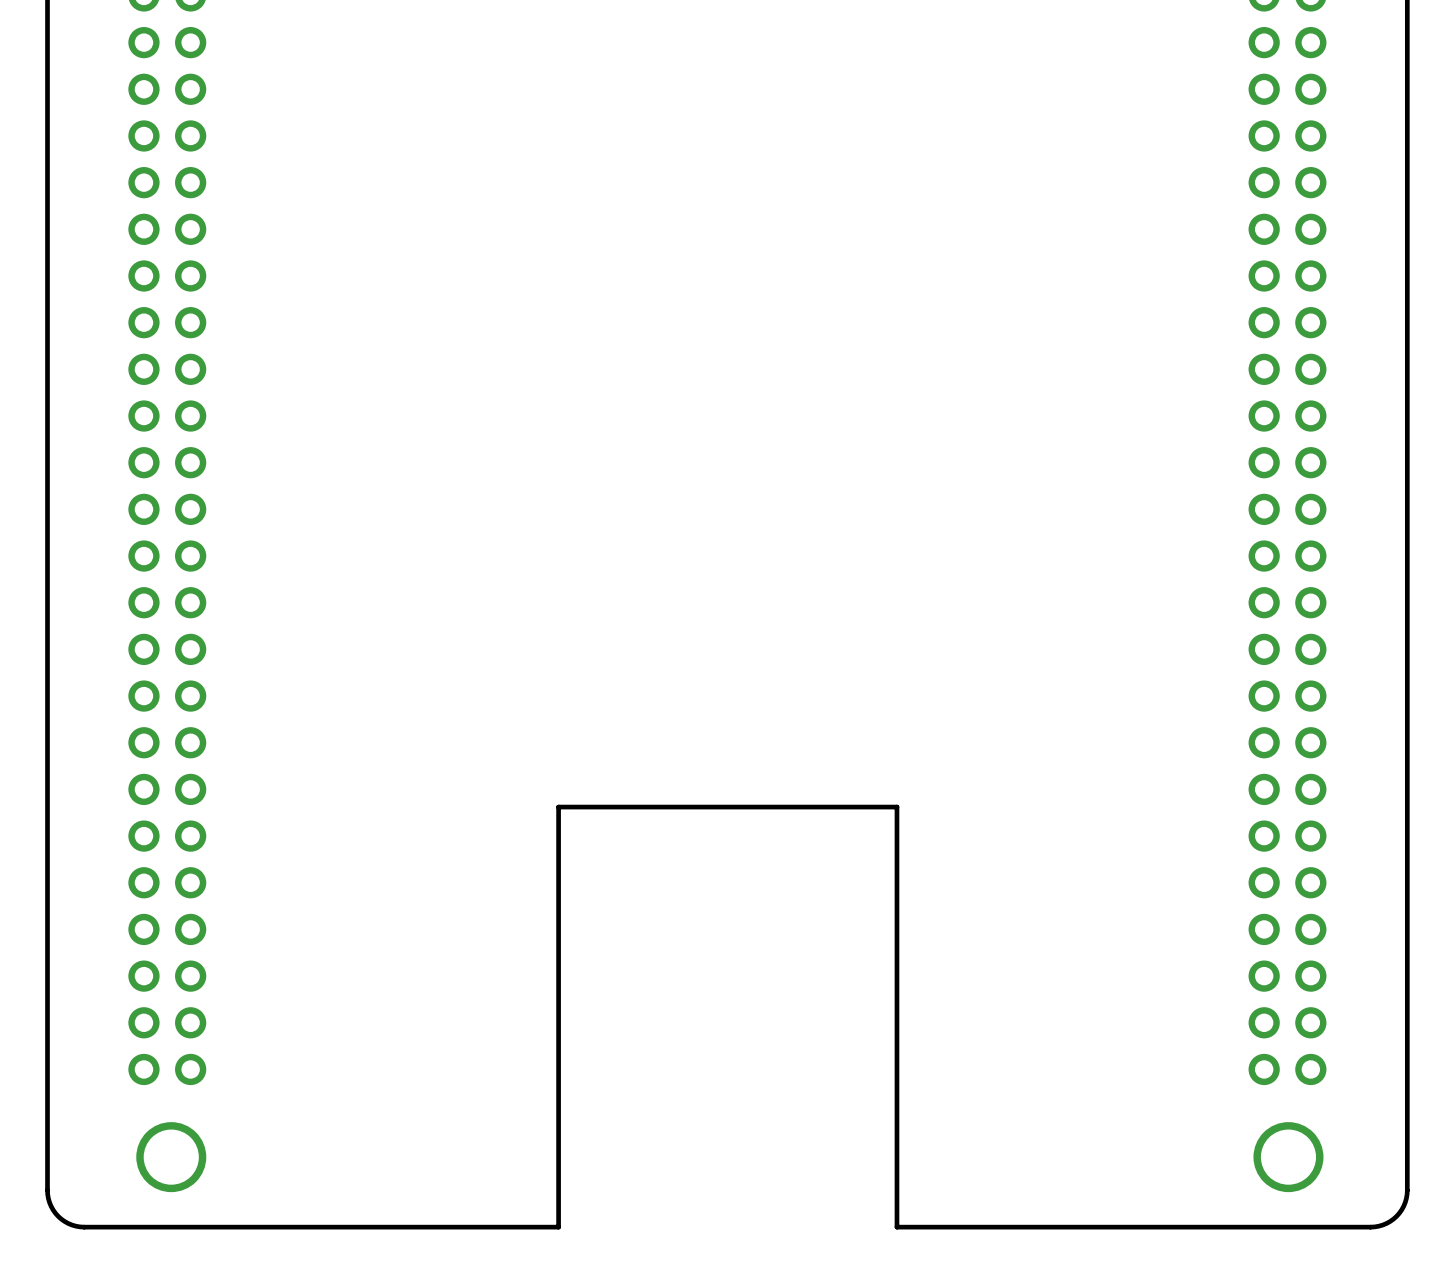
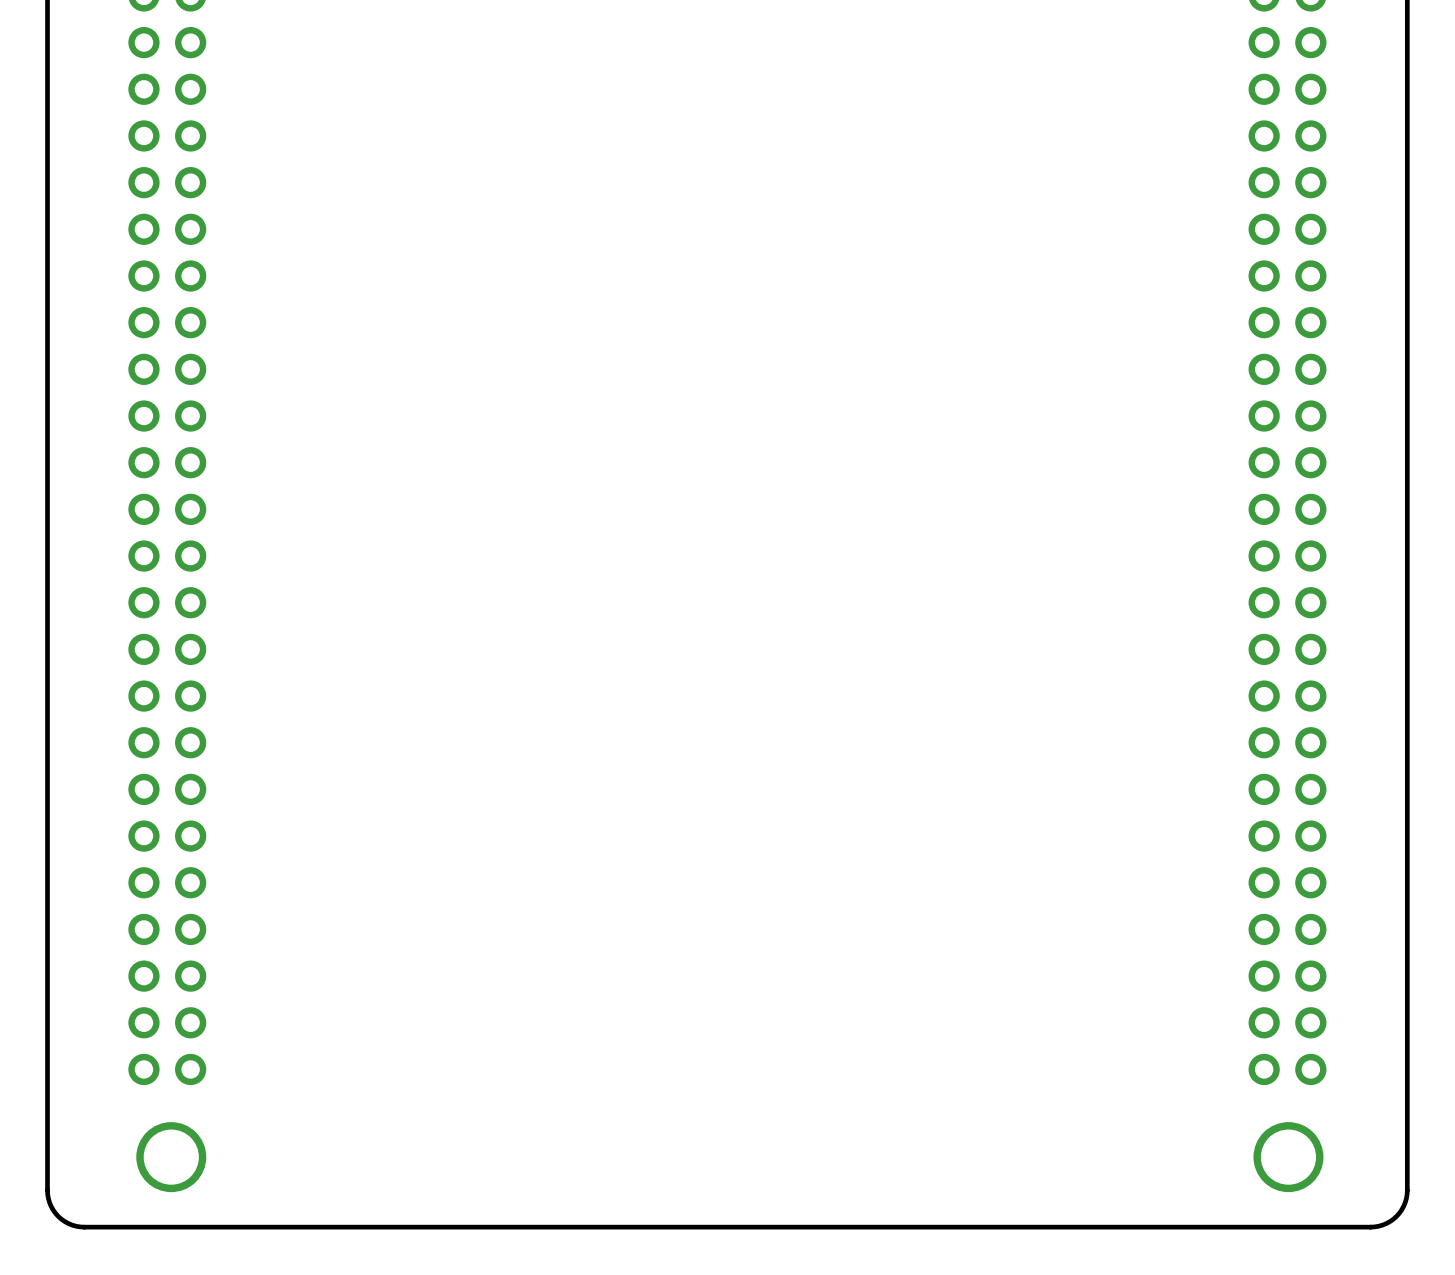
board edge: (558, 1227) (558, 807) (896, 807) (896, 1227) -> (558, 1227) (896, 1227)

